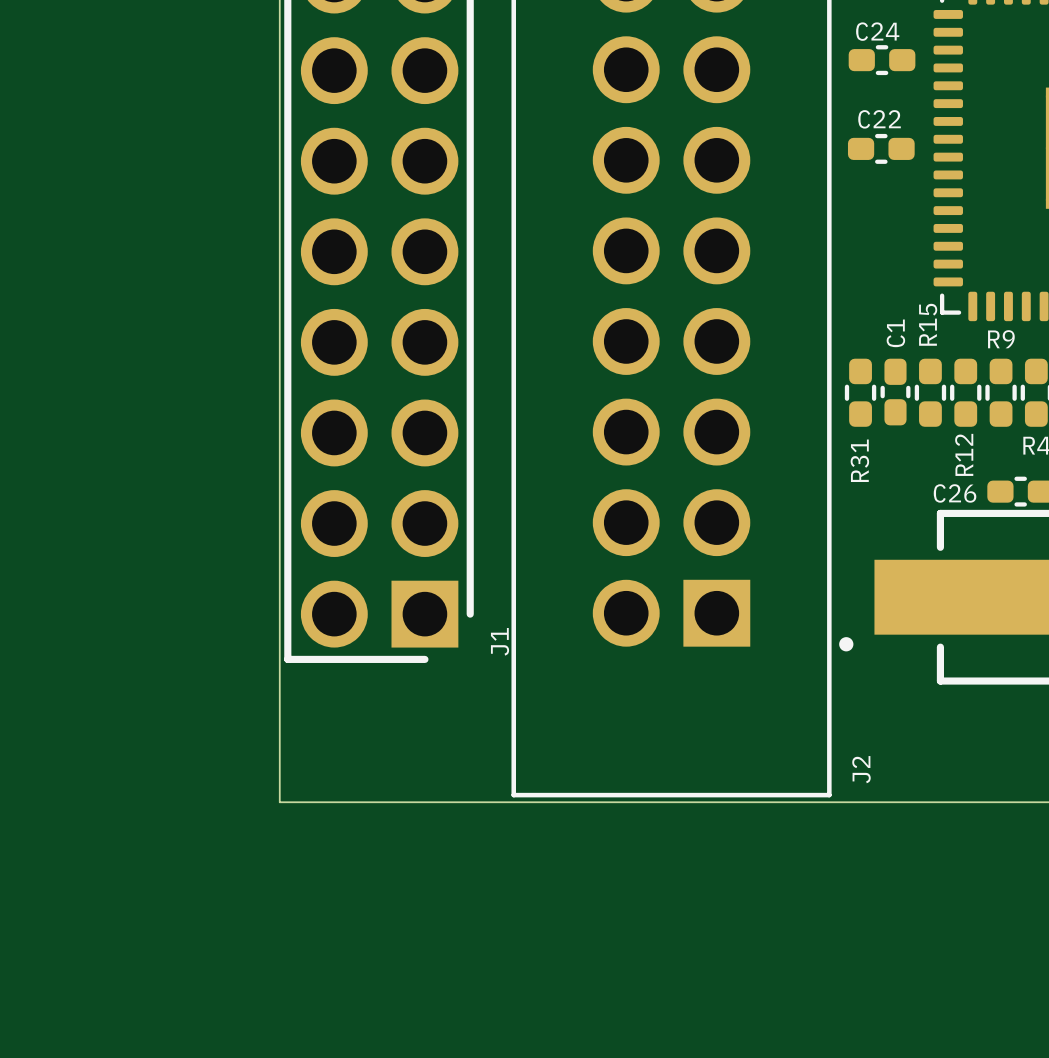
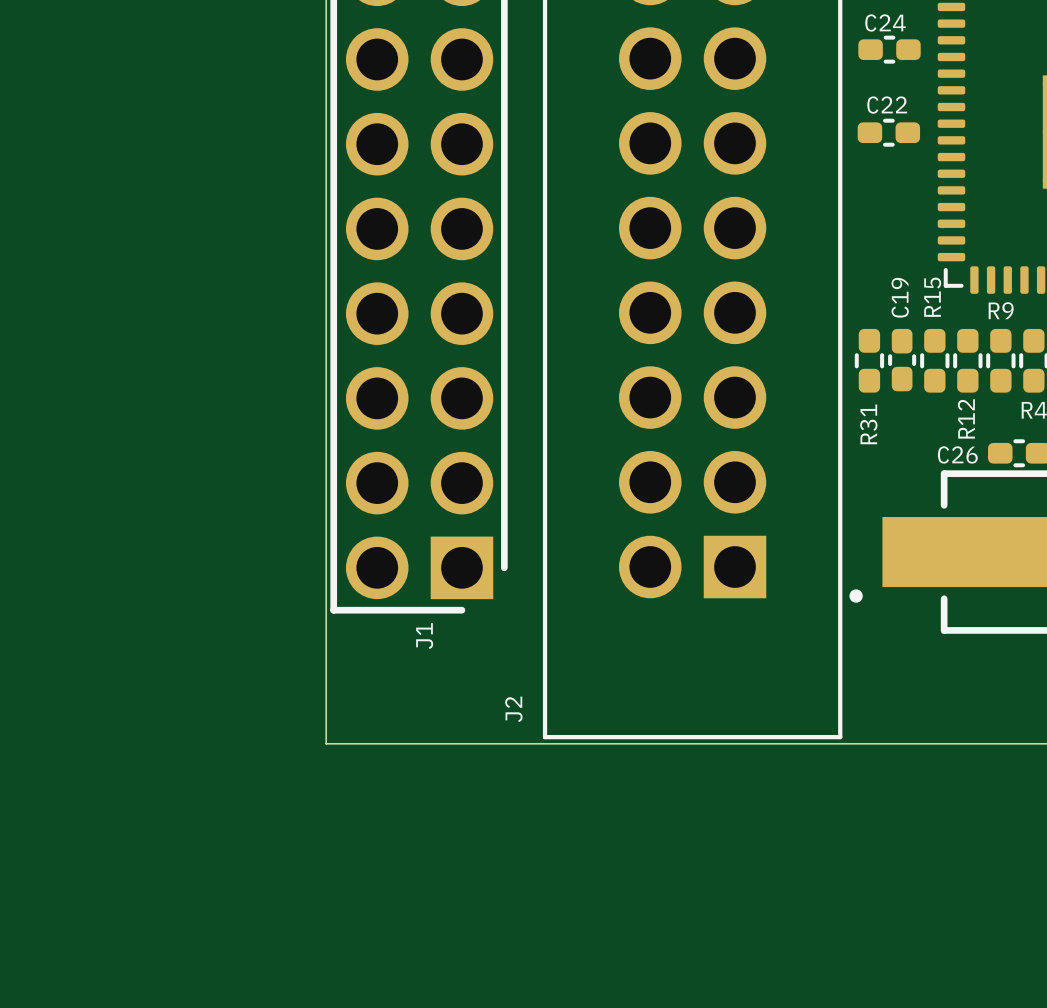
C1 name: C1 (895, 333) -> C19 (900, 297)
J1 name position: J1 (500, 641) -> J1 (424, 636)
J2 name position: J2 (861, 769) -> J2 (513, 709)

